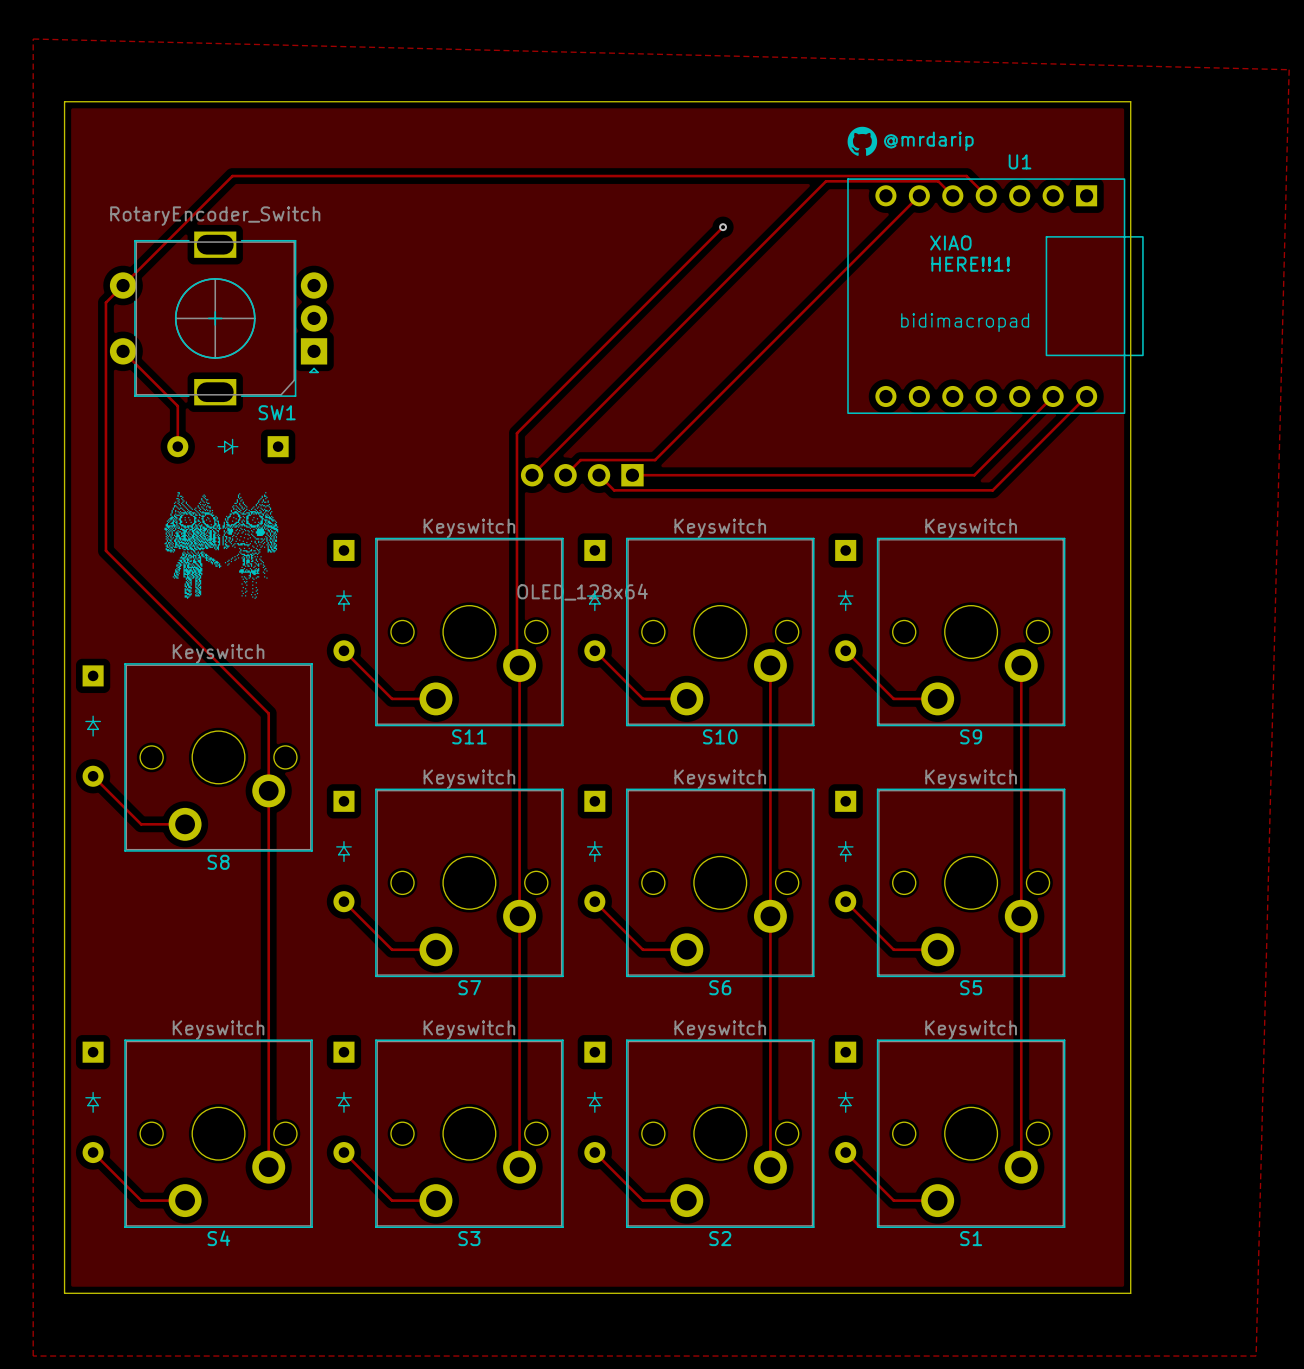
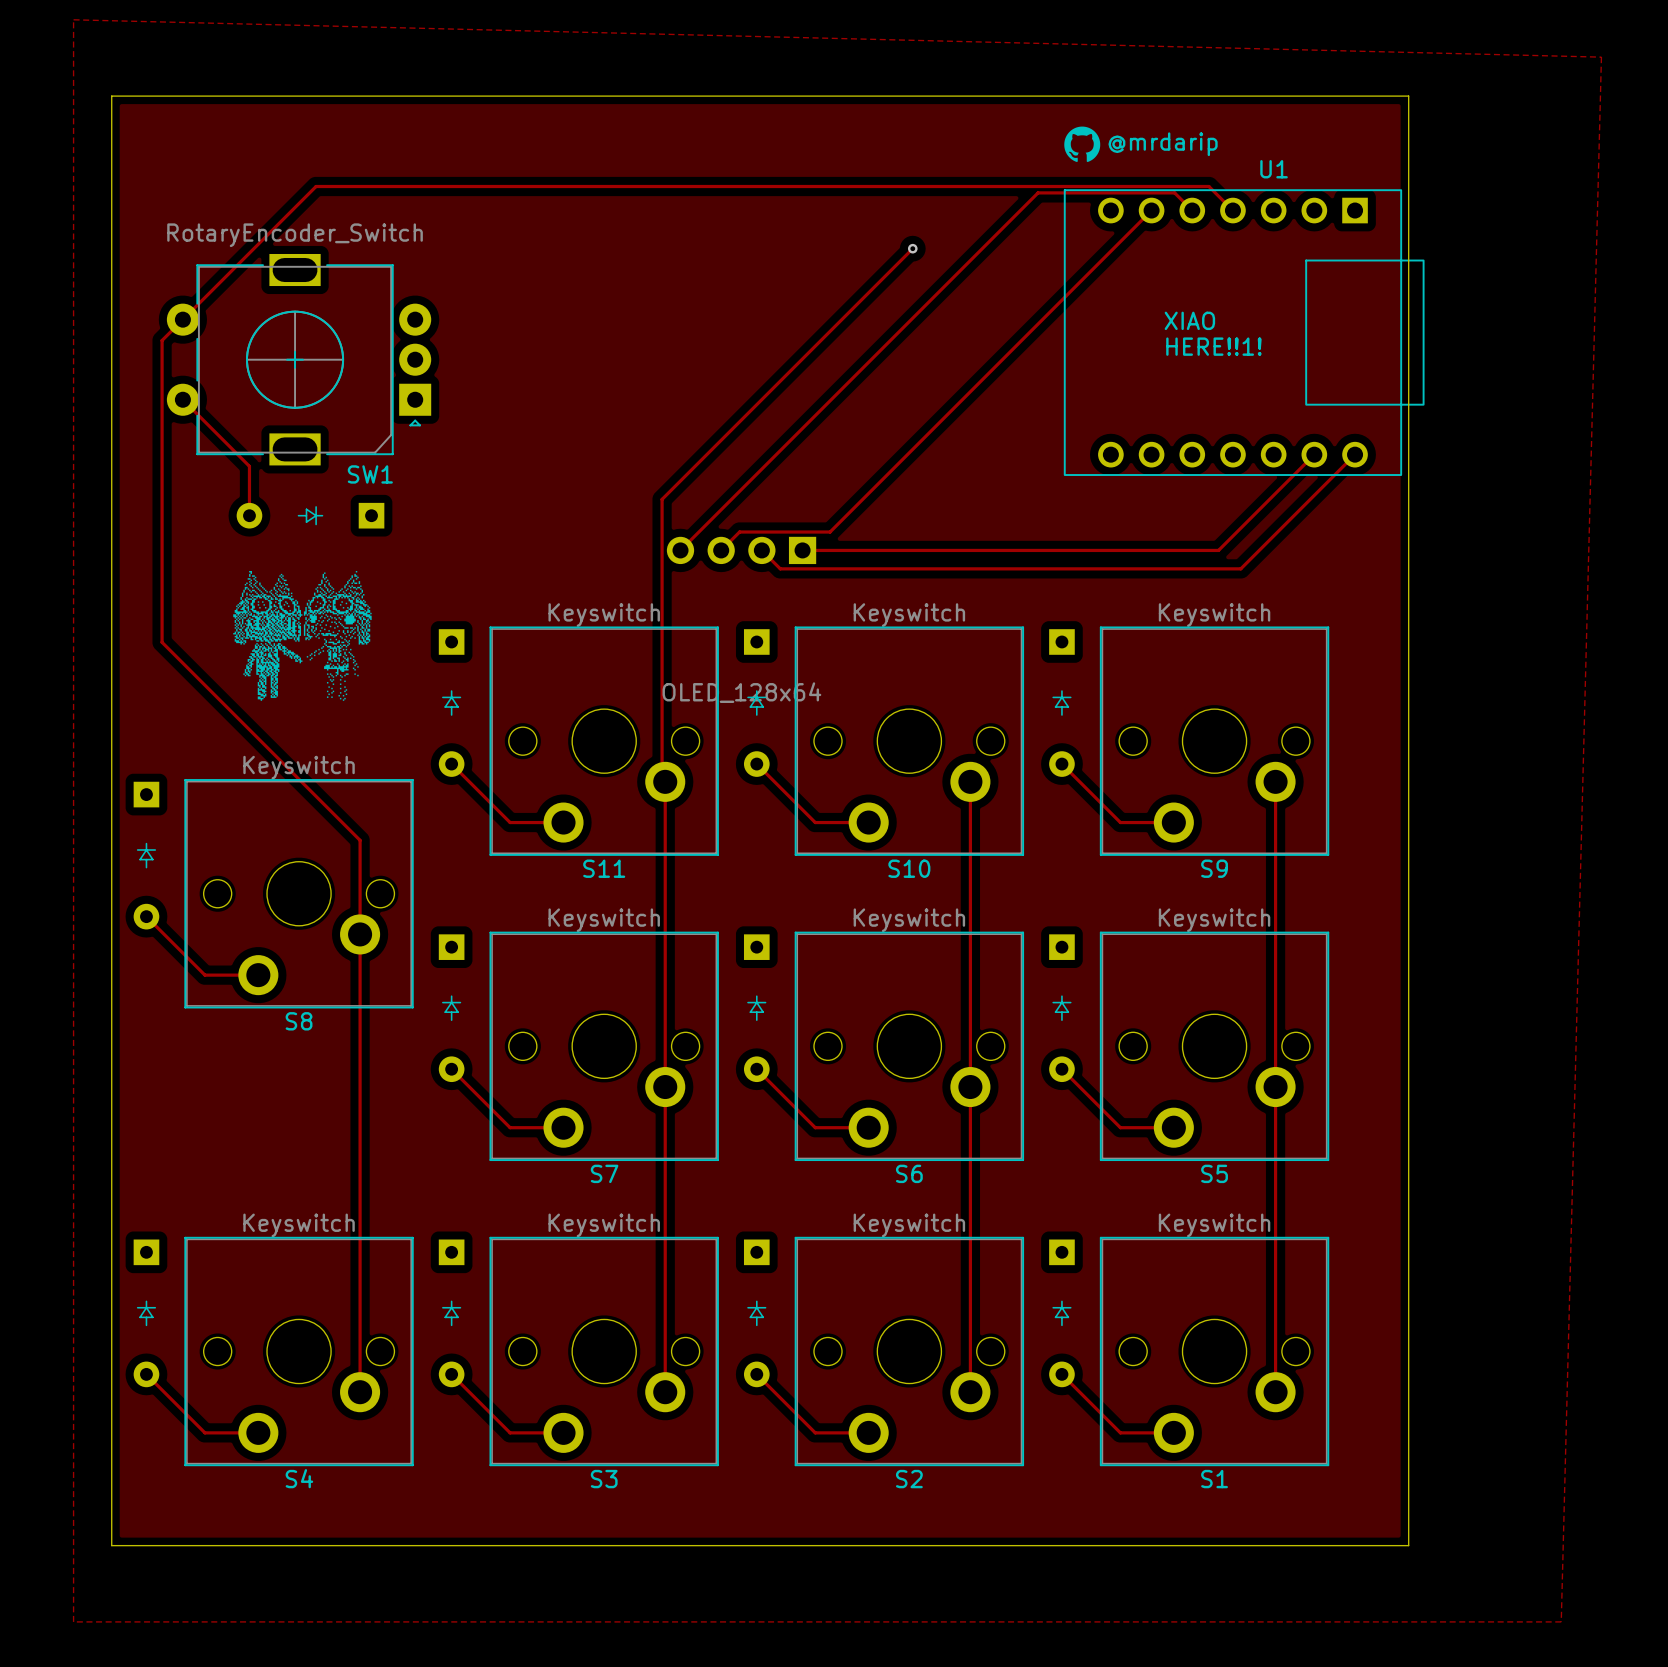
text position: XIAO (950, 243) -> XIAO (1189, 320)
text position: HERE!!1! (970, 264) -> HERE!!1! (1213, 346)
text: bidimacropad (965, 322) -> none

